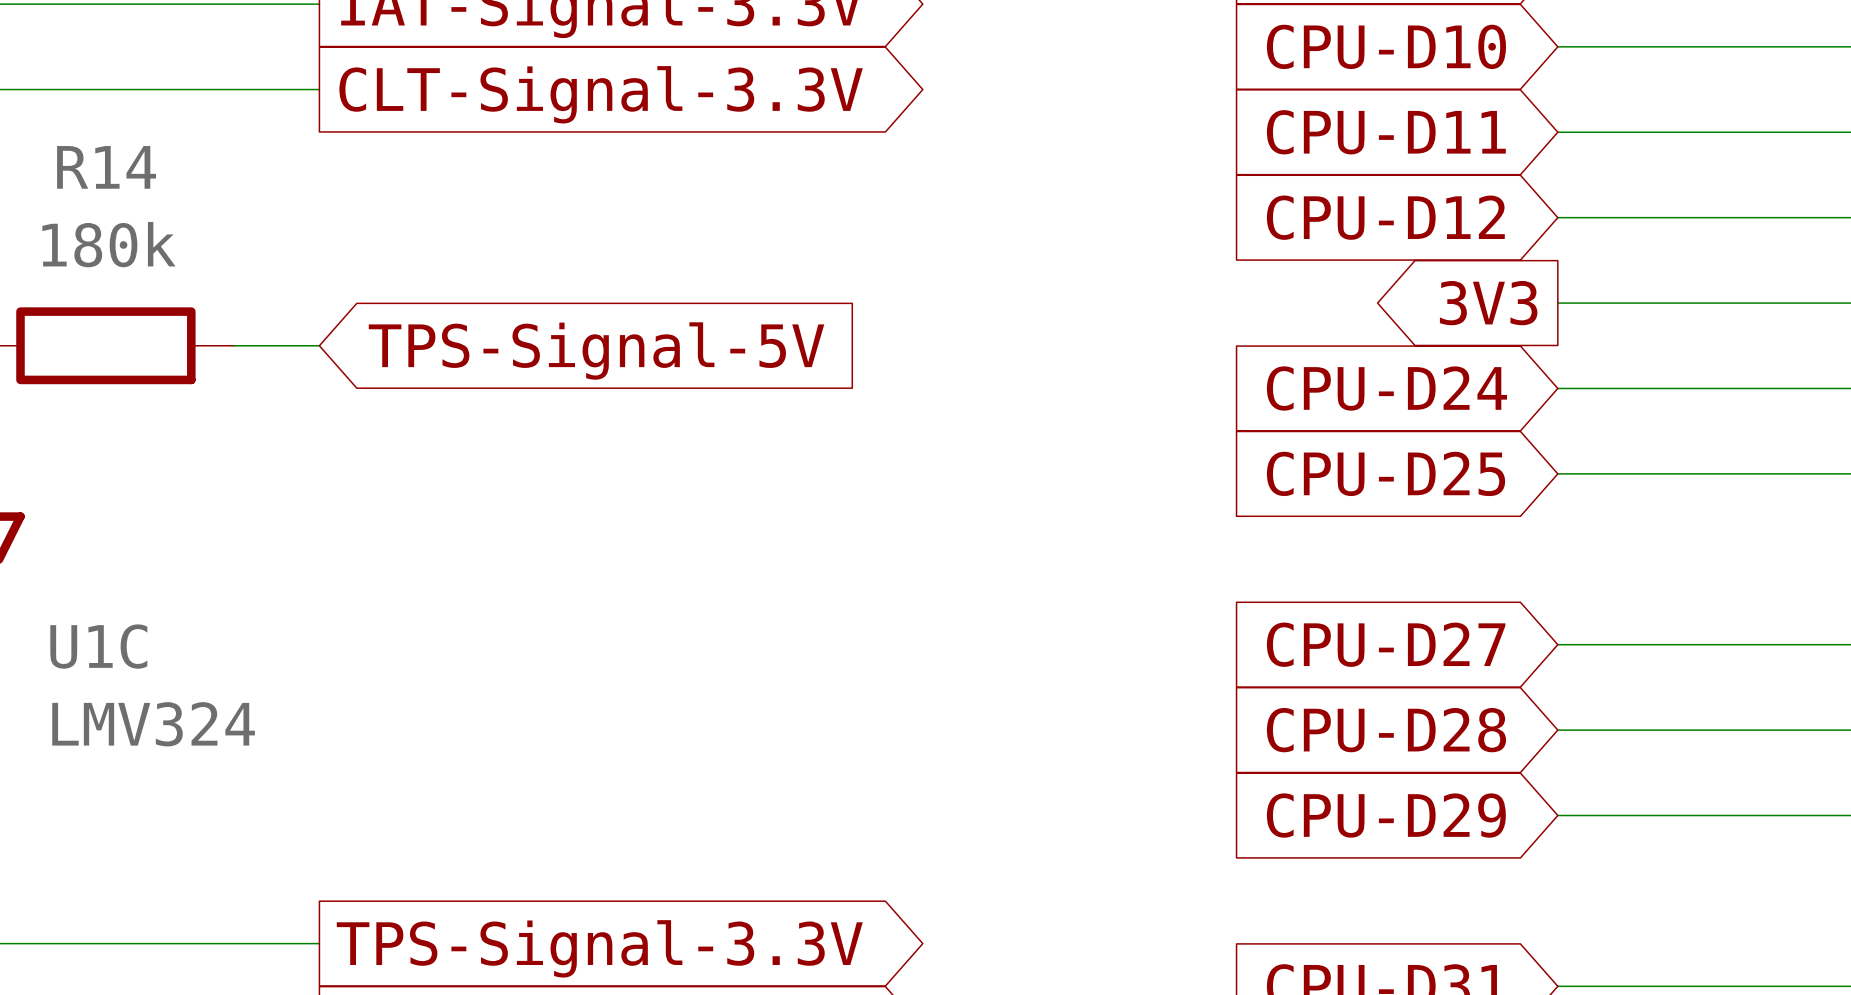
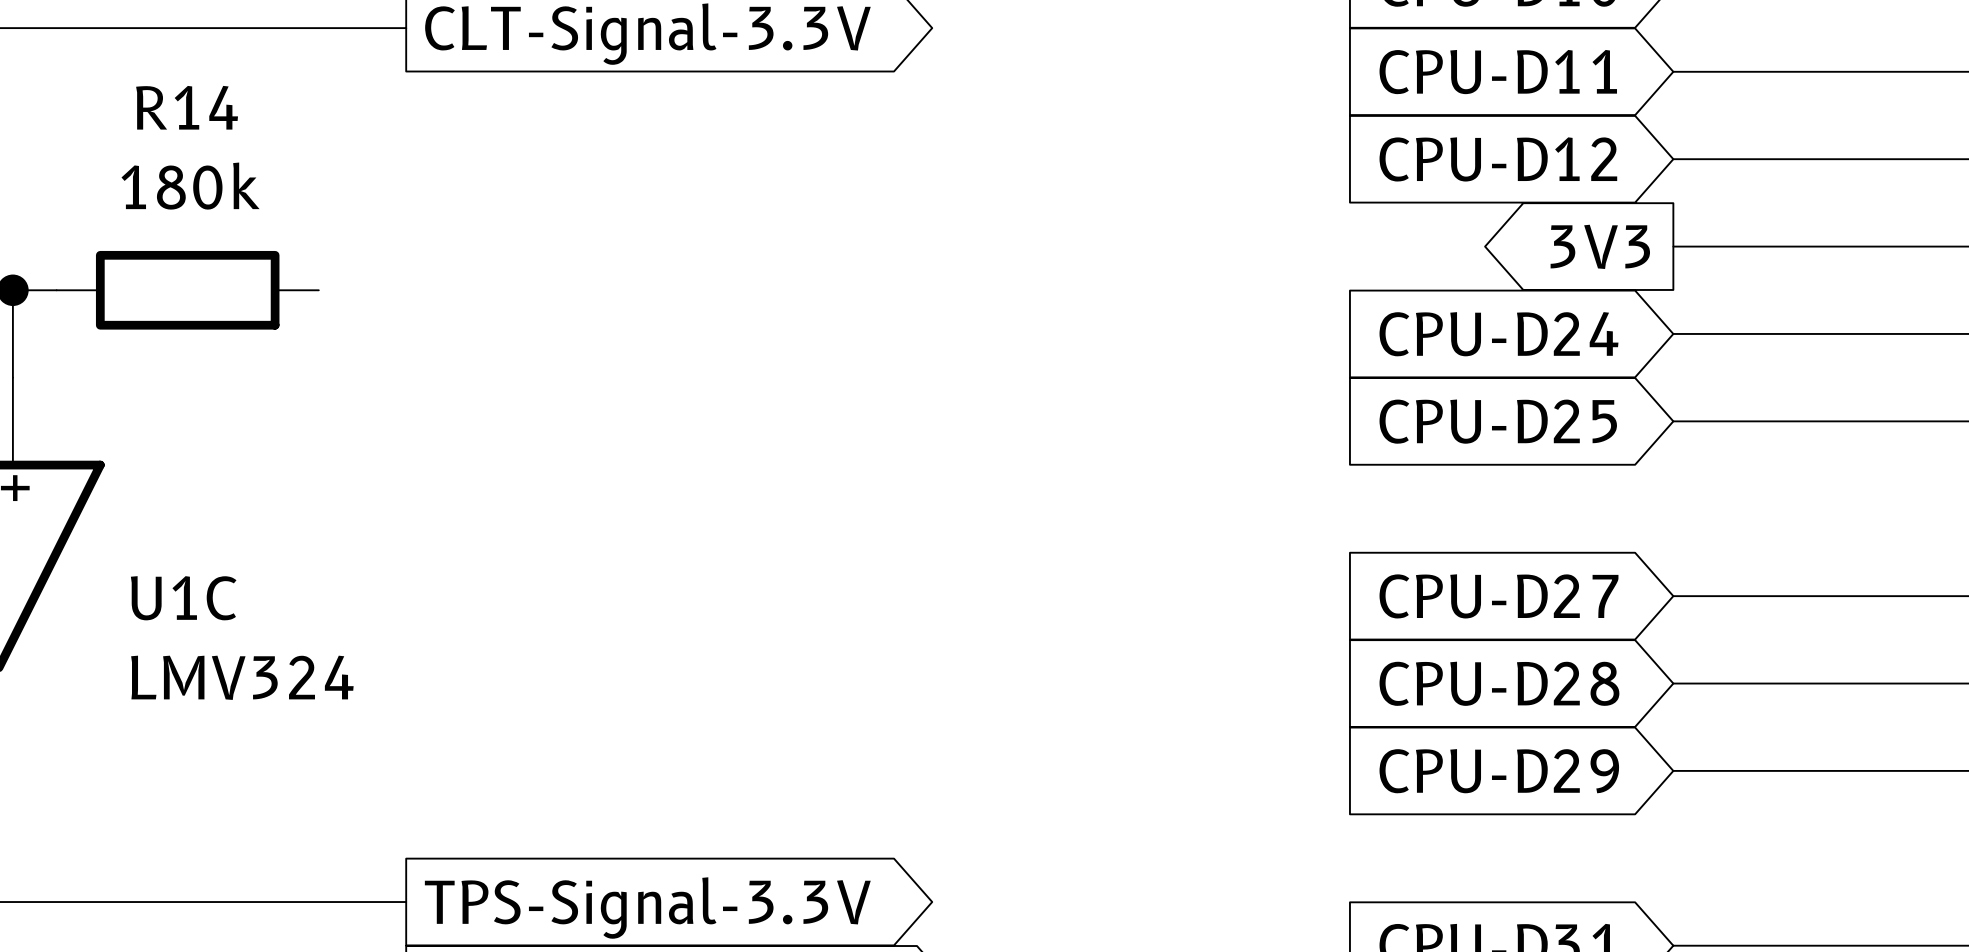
wire: (234, 345) (319, 345) -> none
global label: TPS-Signal-5V (596, 351) -> none

